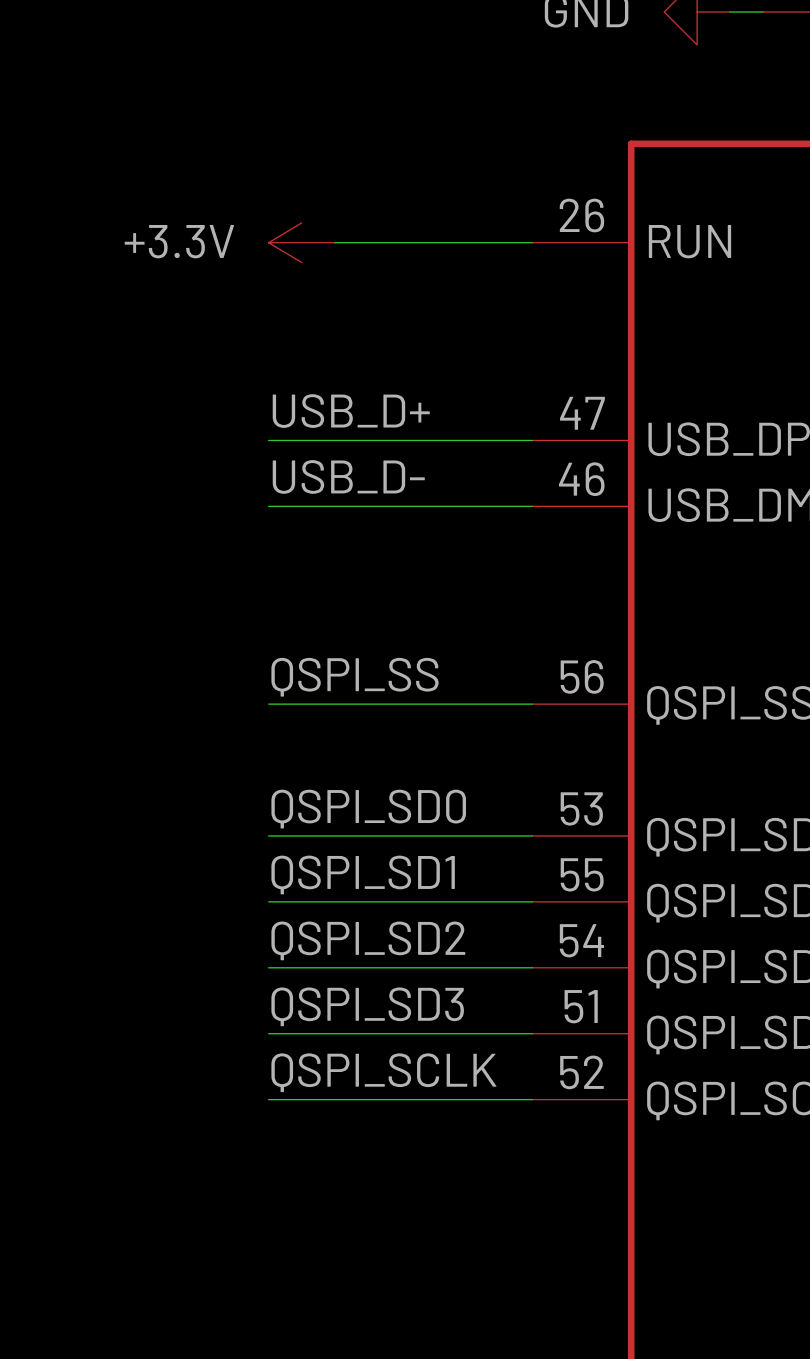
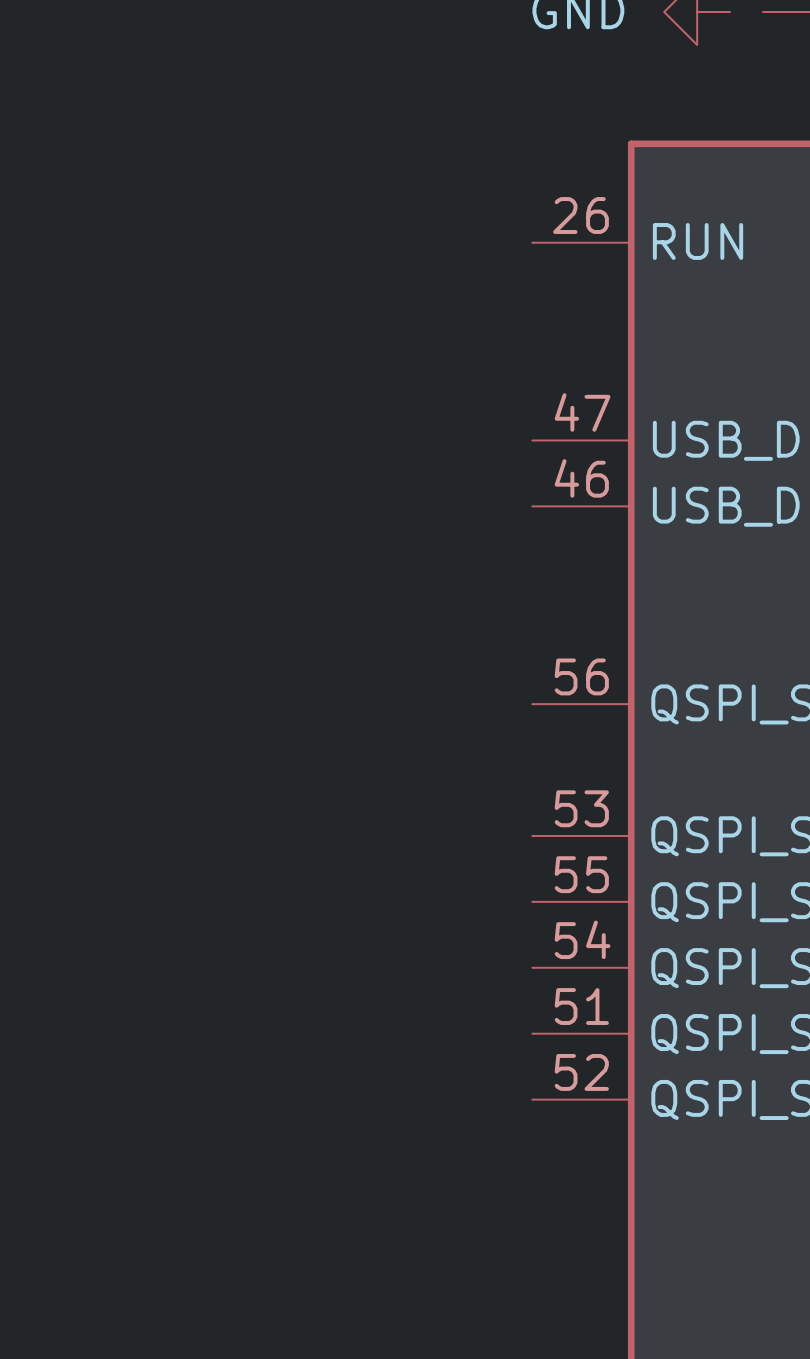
wire: (730, 12) (763, 12) -> none
power symbol: +3.3V (301, 242) -> none
wire: (334, 242) (532, 242) -> none
label: USB_D+ (351, 411) -> none
wire: (268, 440) (532, 440) -> none
label: USB_D- (348, 476) -> none
wire: (268, 506) (532, 506) -> none
label: QSPI_SS (355, 677) -> none
wire: (268, 704) (532, 704) -> none
label: QSPI_SD0 (368, 809) -> none
wire: (268, 835) (532, 835) -> none
label: QSPI_SD1 (363, 874) -> none
wire: (268, 901) (532, 901) -> none
label: QSPI_SD2 (368, 940) -> none
wire: (268, 967) (532, 967) -> none
label: QSPI_SD3 (367, 1006) -> none
wire: (268, 1033) (532, 1033) -> none
label: QSPI_SCLK (383, 1072) -> none
wire: (268, 1099) (532, 1099) -> none

